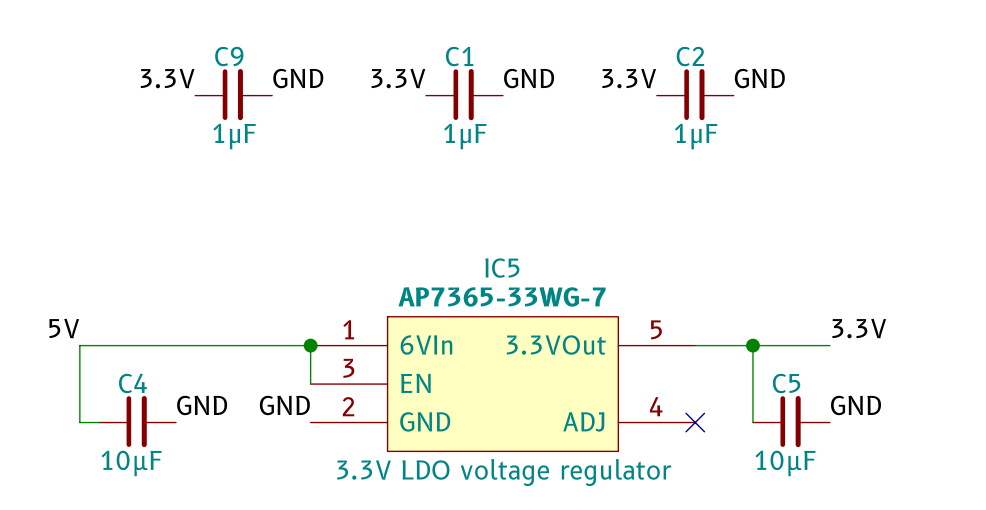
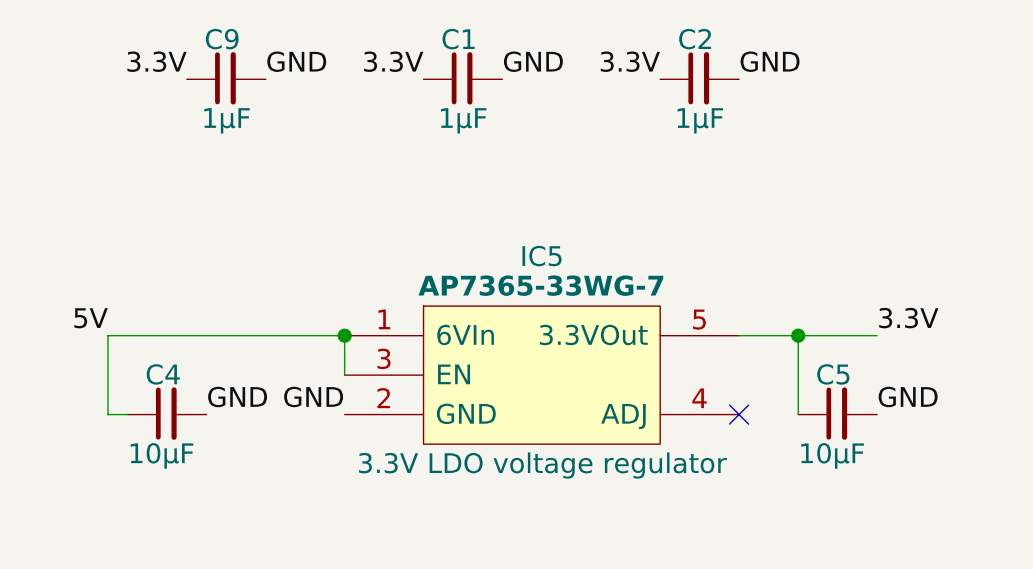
label position: 3.3V (167, 78) -> 3.3V (157, 61)
label position: GND (298, 78) -> GND (296, 61)
label position: 3.3V (398, 78) -> 3.3V (393, 61)
label position: GND (529, 78) -> GND (533, 61)
label position: 3.3V (629, 78) -> 3.3V (630, 61)
label position: GND (759, 78) -> GND (770, 61)
C9 position: (233, 94) -> (226, 78)
C1 position: (464, 94) -> (462, 78)
C2 position: (695, 94) -> (699, 78)

